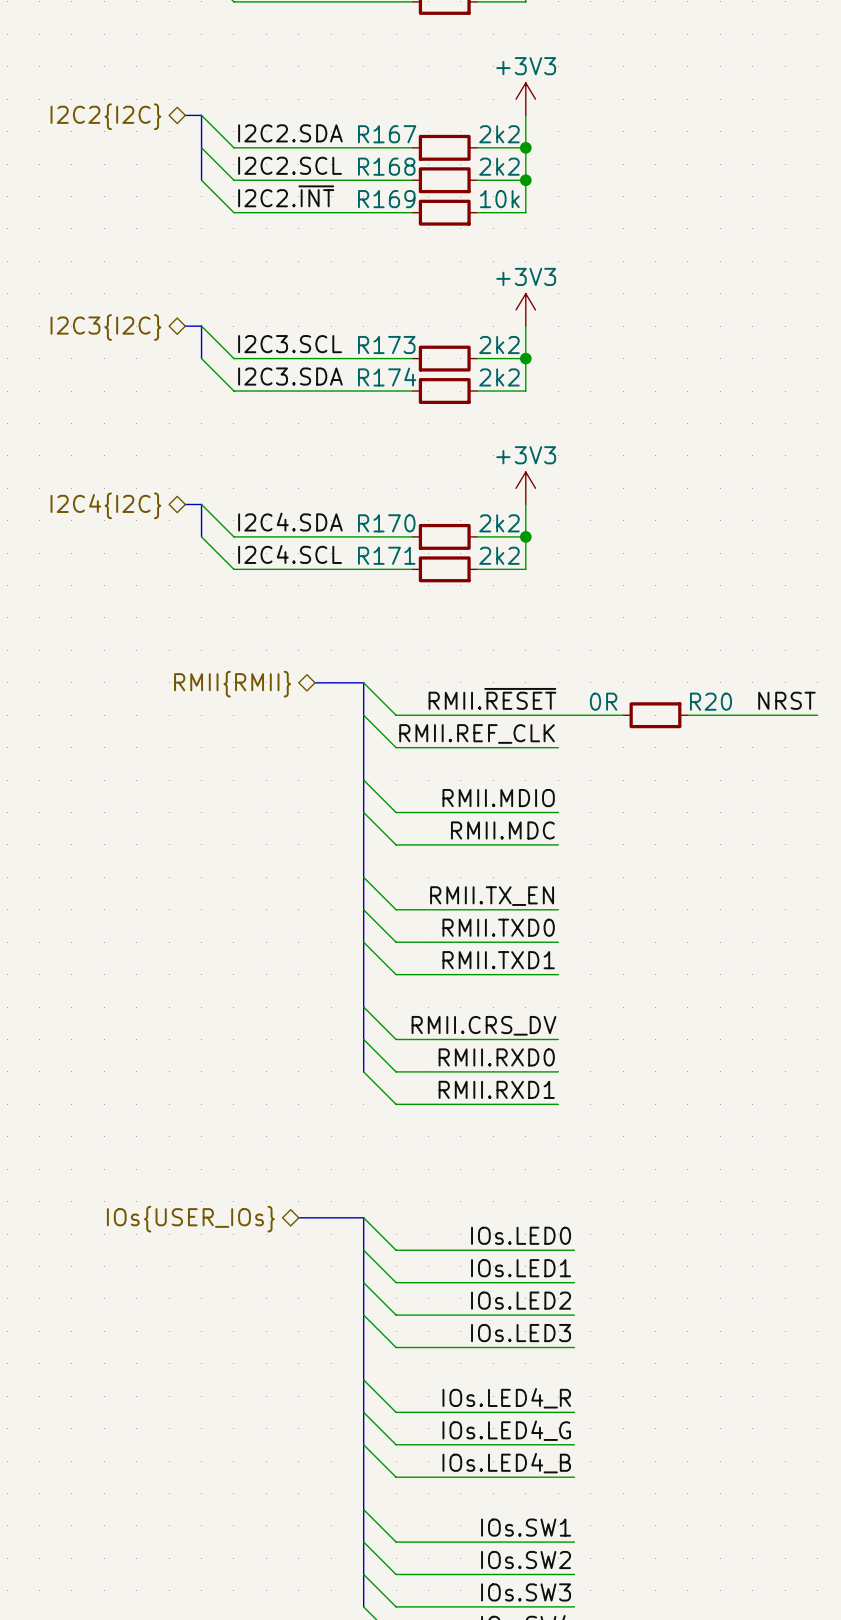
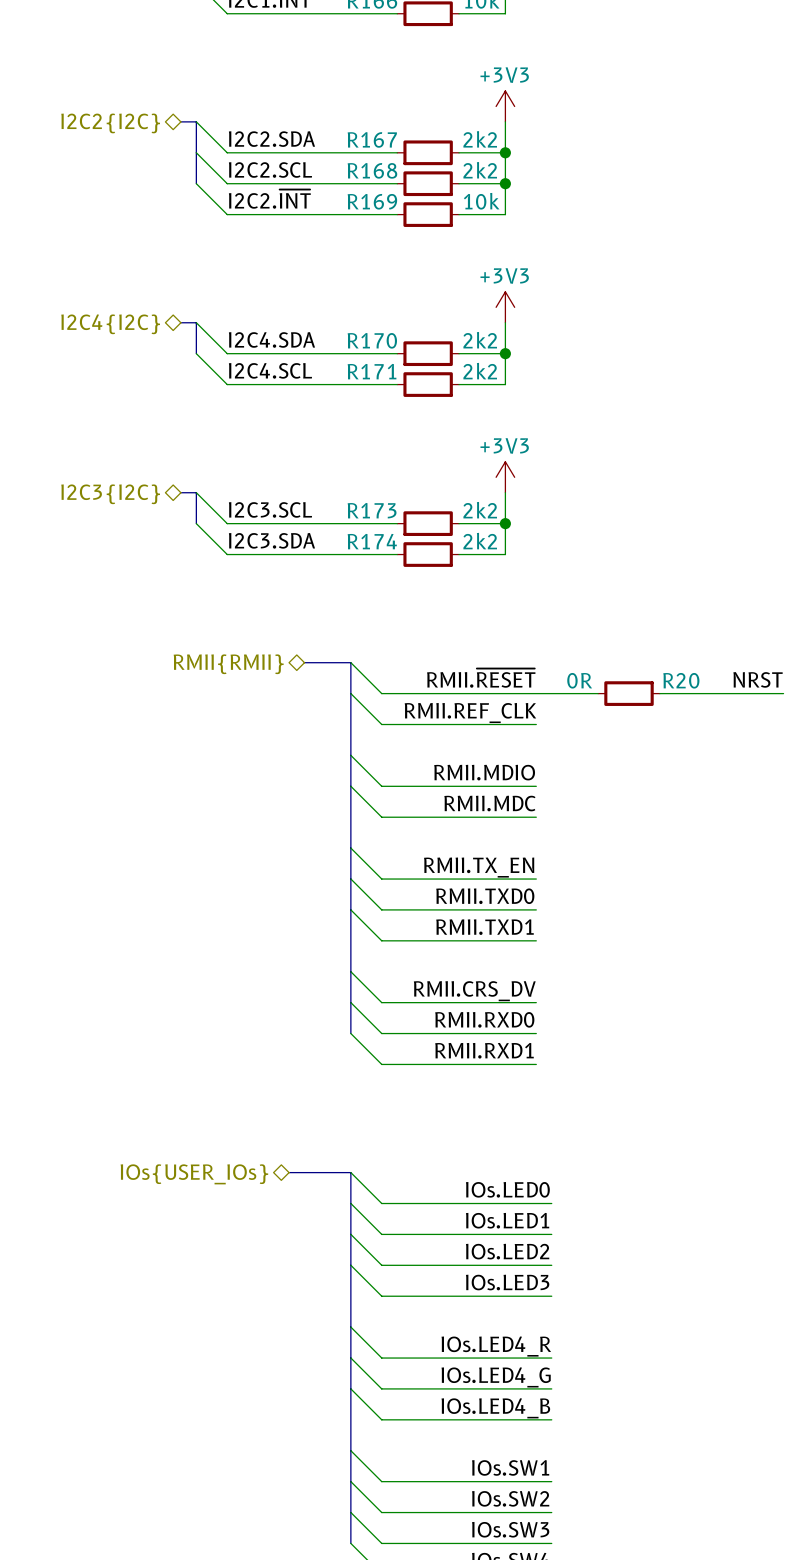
hierarchical label: I2C3{I2C} (105, 327) -> I2C4{I2C} (110, 324)
label: I2C3.SCL (290, 344) -> I2C4.SDA (271, 339)
R173 name: R173 (386, 345) -> R170 (372, 340)
label: I2C3.SDA (290, 376) -> I2C4.SCL (270, 370)
R174 name: R174 (387, 377) -> R171 (372, 371)
hierarchical label: I2C4{I2C} (105, 505) -> I2C3{I2C} (110, 494)
label: I2C4.SDA (290, 522) -> I2C3.SCL (270, 509)
R170 name: R170 (386, 523) -> R173 (372, 510)
label: I2C4.SCL (290, 554) -> I2C3.SDA (271, 540)
R171 name: R171 (386, 555) -> R174 (372, 541)

